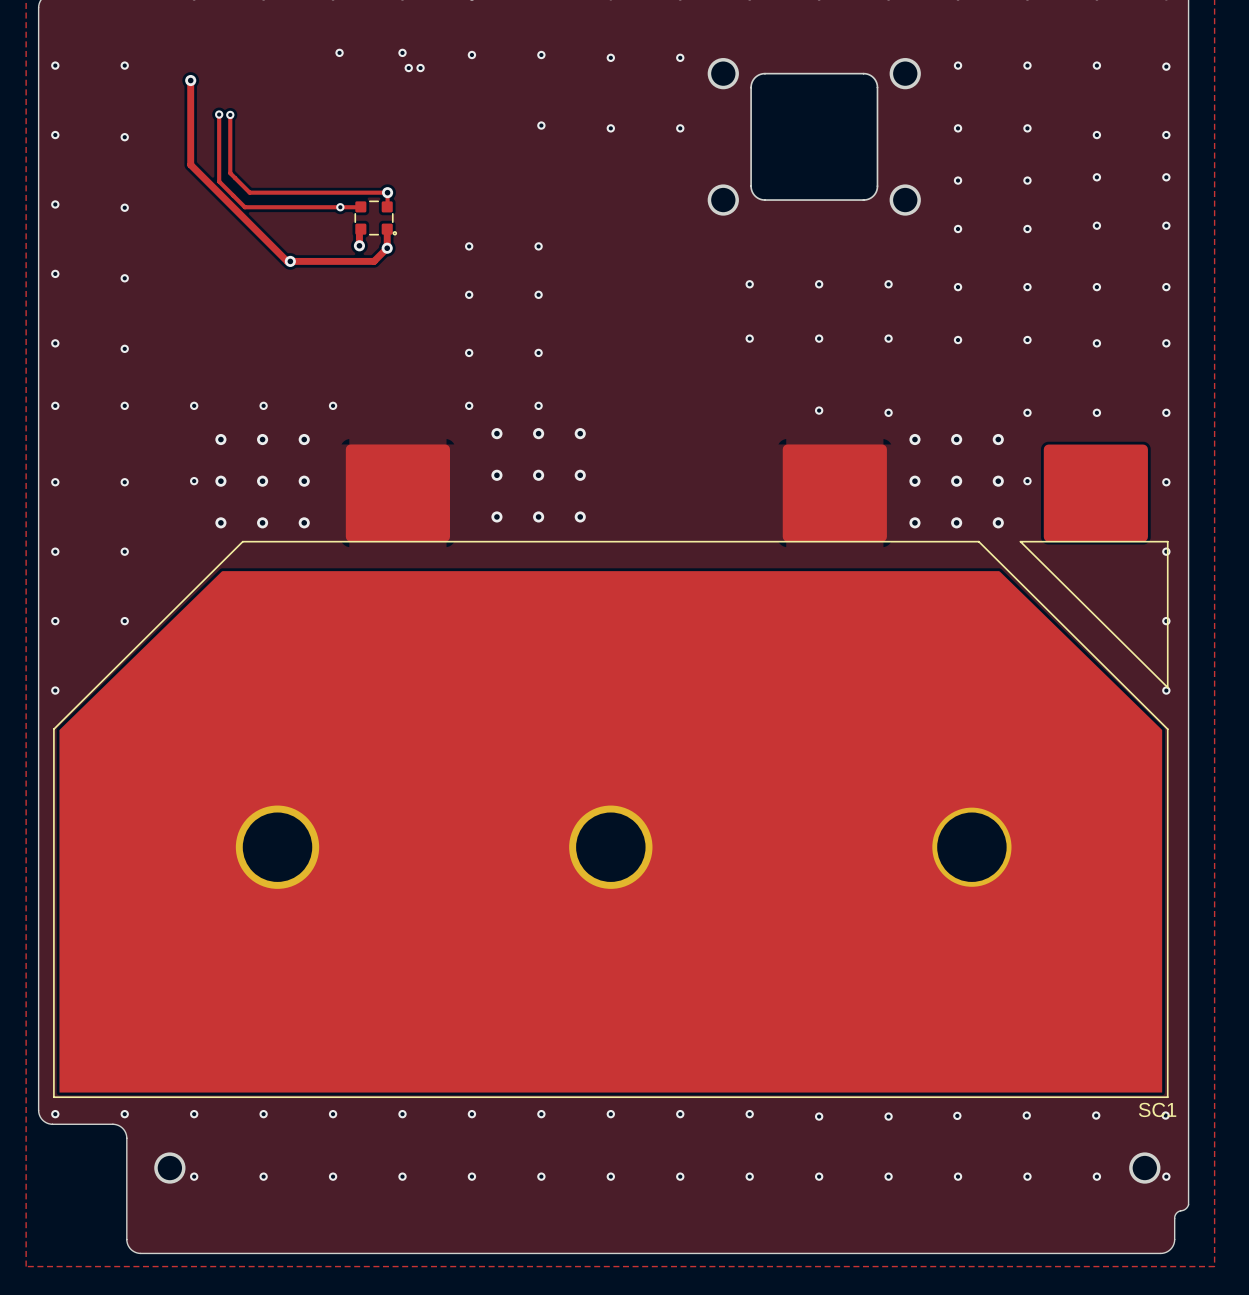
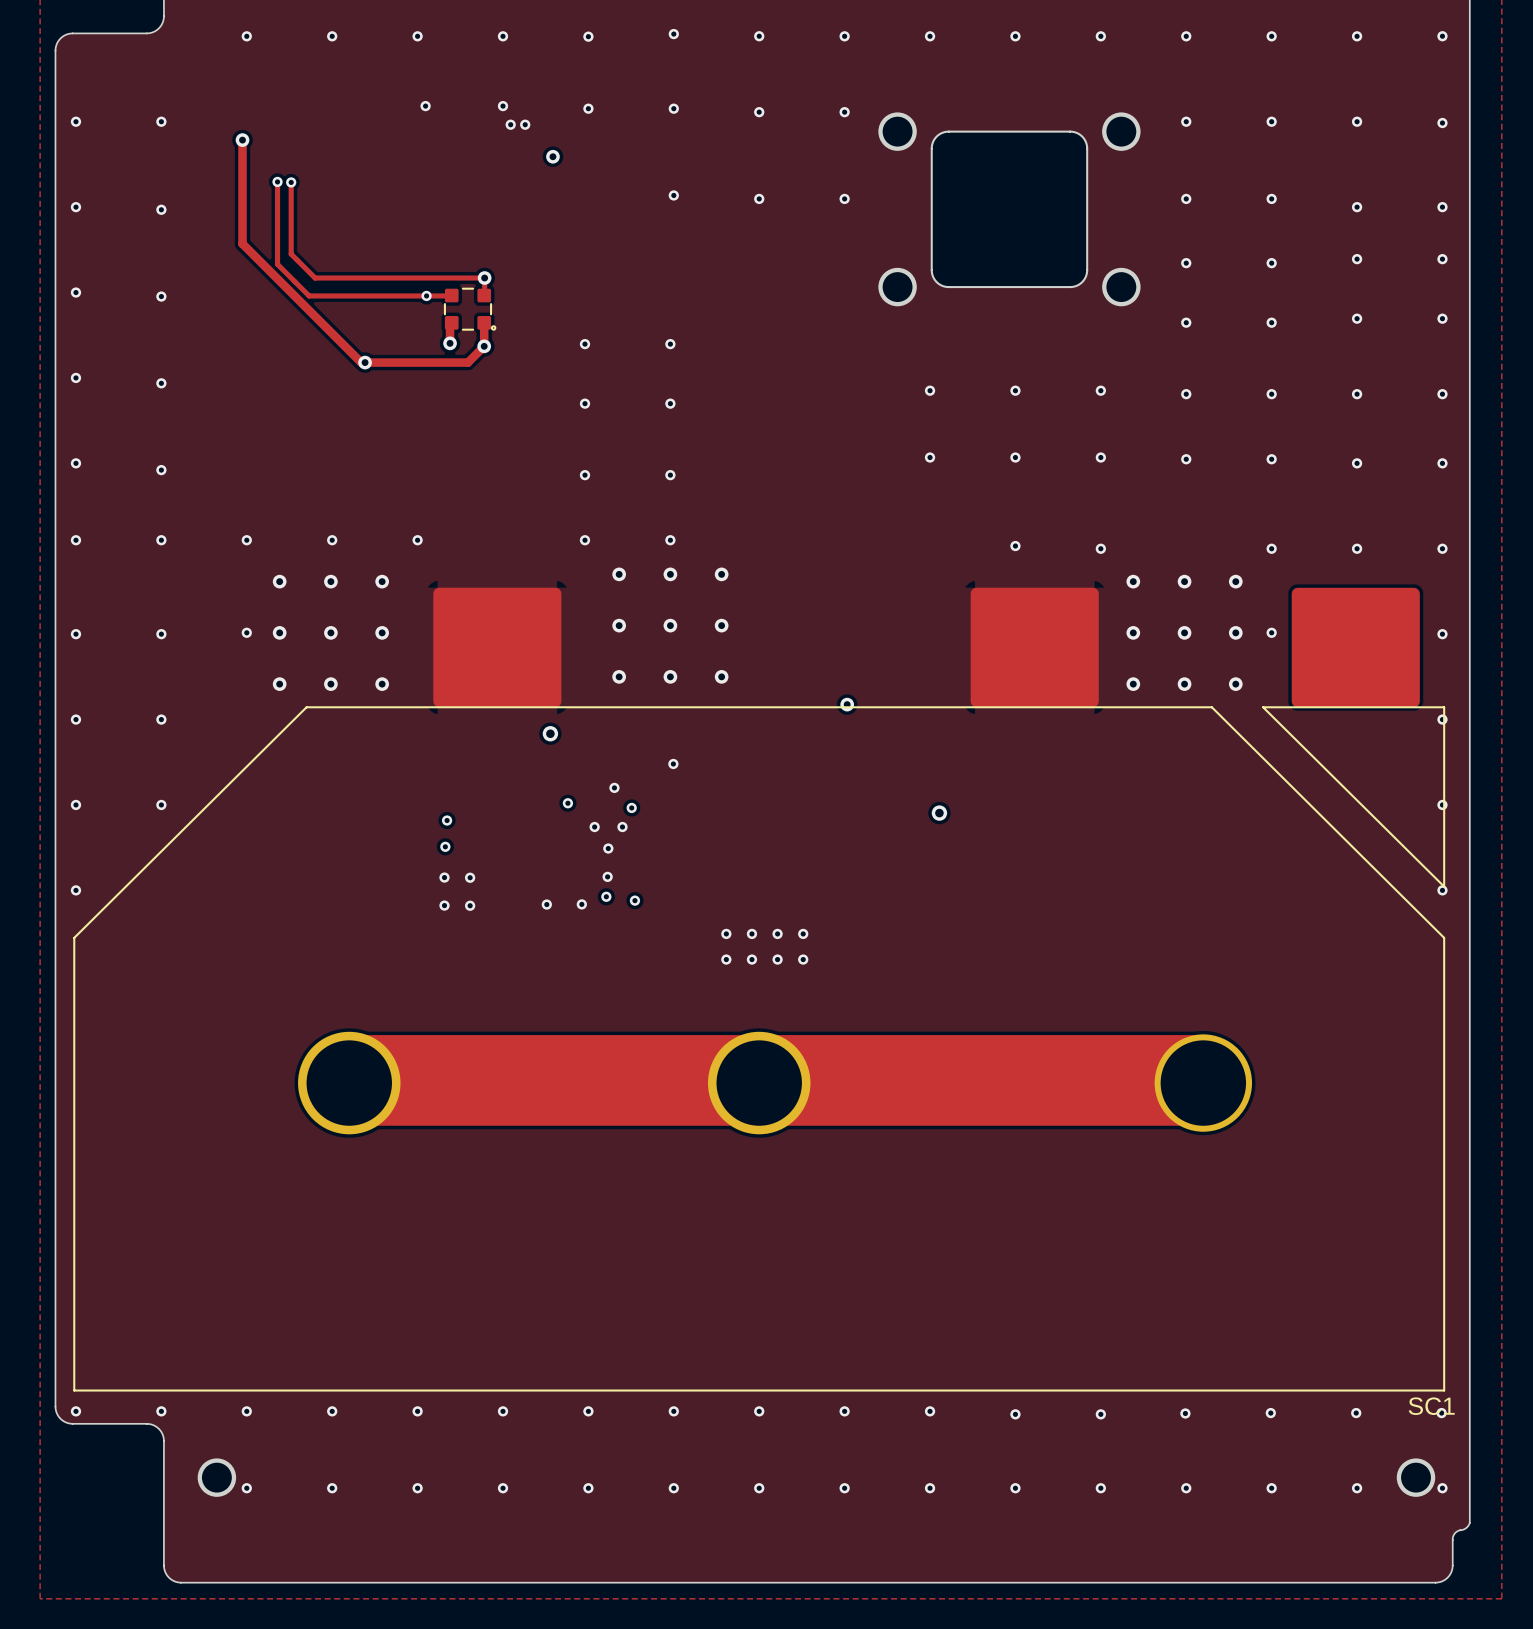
via: none -> (552, 156)
SC1 footprint: [53, 444, 1169, 1099] -> [73, 587, 1446, 1392]
via: none -> (847, 704)
via: none -> (550, 733)
via: none -> (673, 763)
via: none -> (614, 787)
via: none -> (567, 803)
via: none -> (631, 807)
via: none -> (939, 813)
via: none -> (447, 820)
via: none -> (594, 827)
via: none -> (622, 827)
via: none -> (445, 846)
via: none -> (608, 848)
via: none -> (607, 876)
via: none -> (444, 877)
via: none -> (470, 877)
via: none -> (606, 896)
via: none -> (634, 900)
via: none -> (581, 904)
via: none -> (444, 905)
via: none -> (546, 904)
via: none -> (470, 905)
via: none -> (726, 933)
via: none -> (751, 933)
via: none -> (777, 933)
via: none -> (803, 933)
via: none -> (726, 959)
via: none -> (751, 959)
via: none -> (777, 959)
via: none -> (803, 959)

